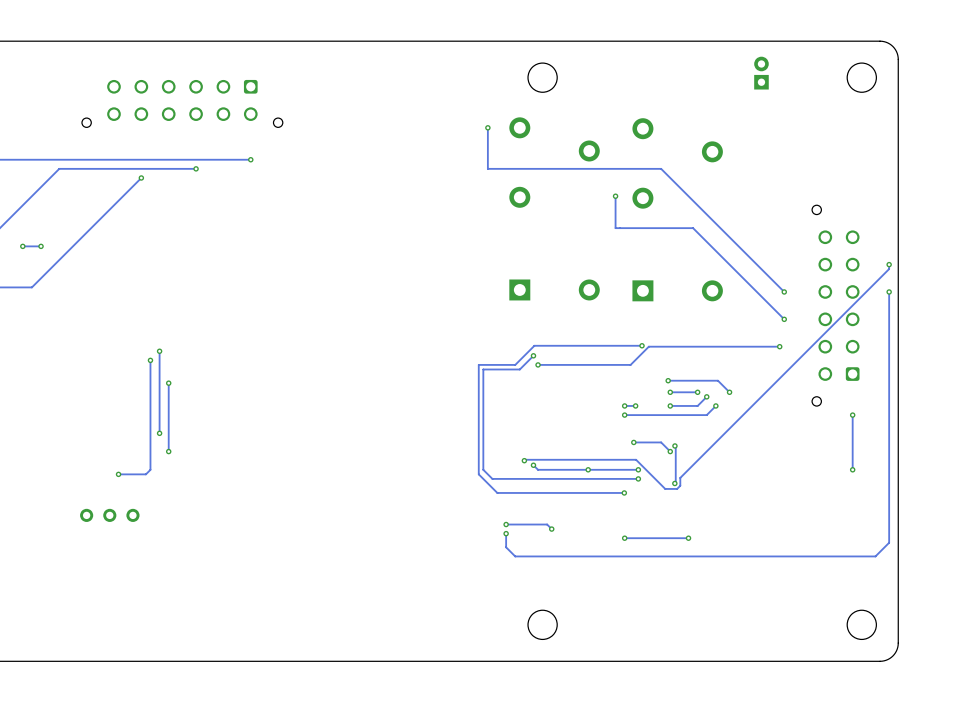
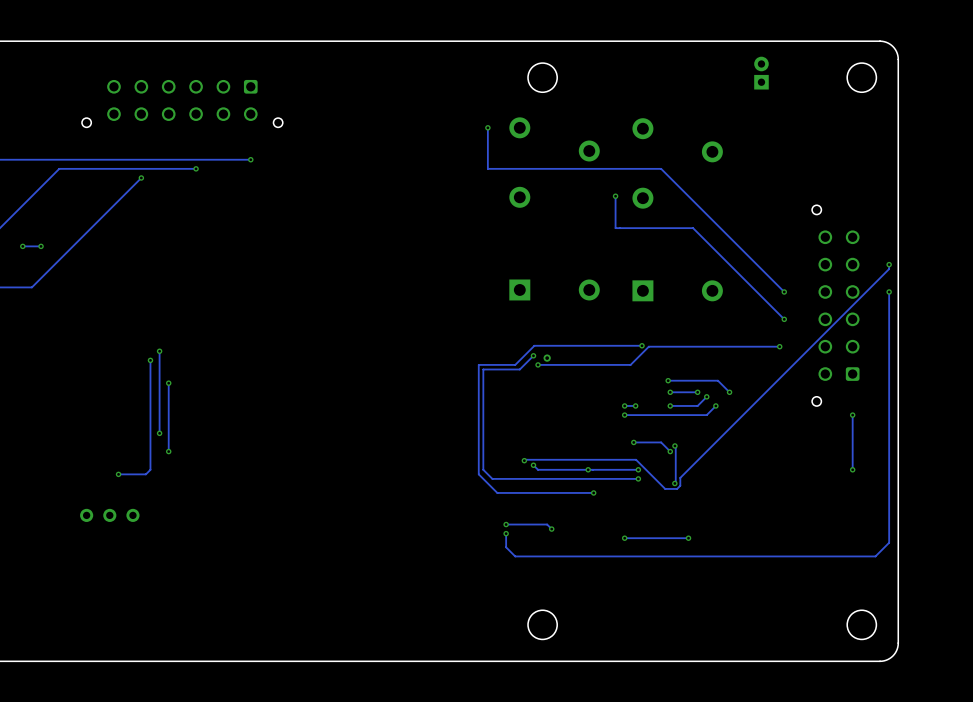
via: none -> (547, 358)
track: (623, 492) (593, 492) -> none
via position: (624, 492) -> (593, 492)

